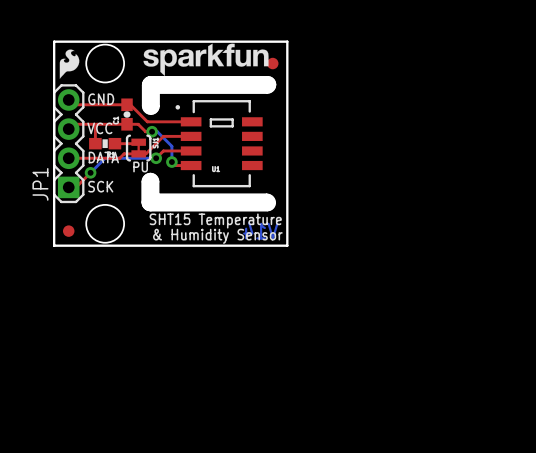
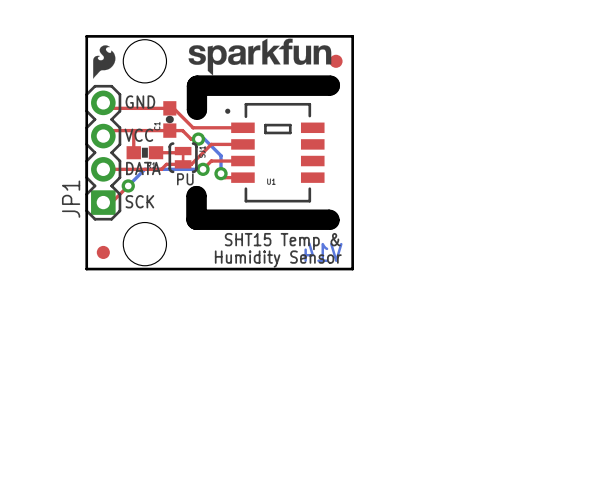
text: SHT15 Temperature (215, 221) -> SHT15 Temp & (282, 241)
text: & Humidity Sensor (217, 236) -> Humidity Sensor (278, 259)

